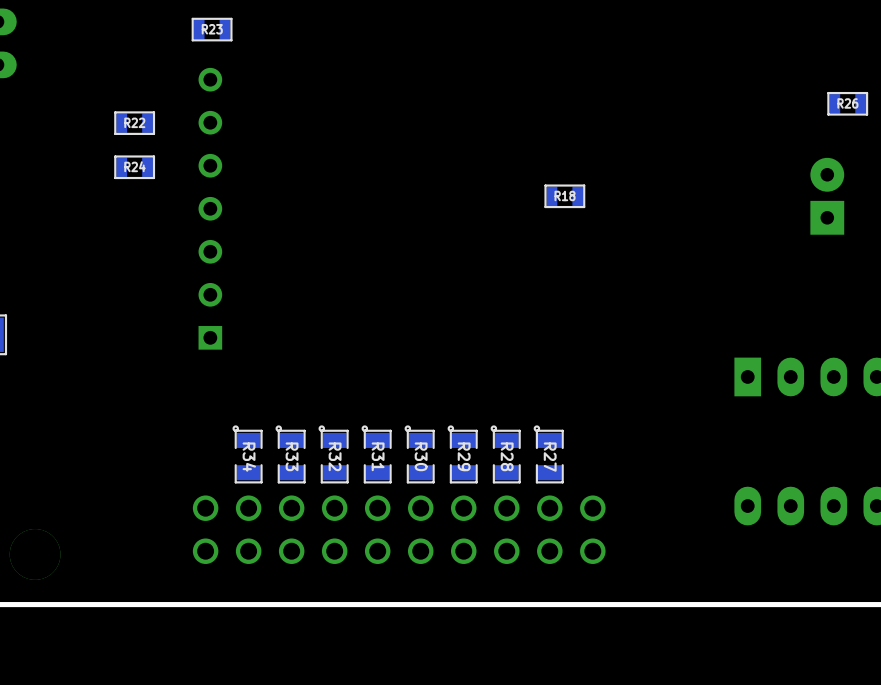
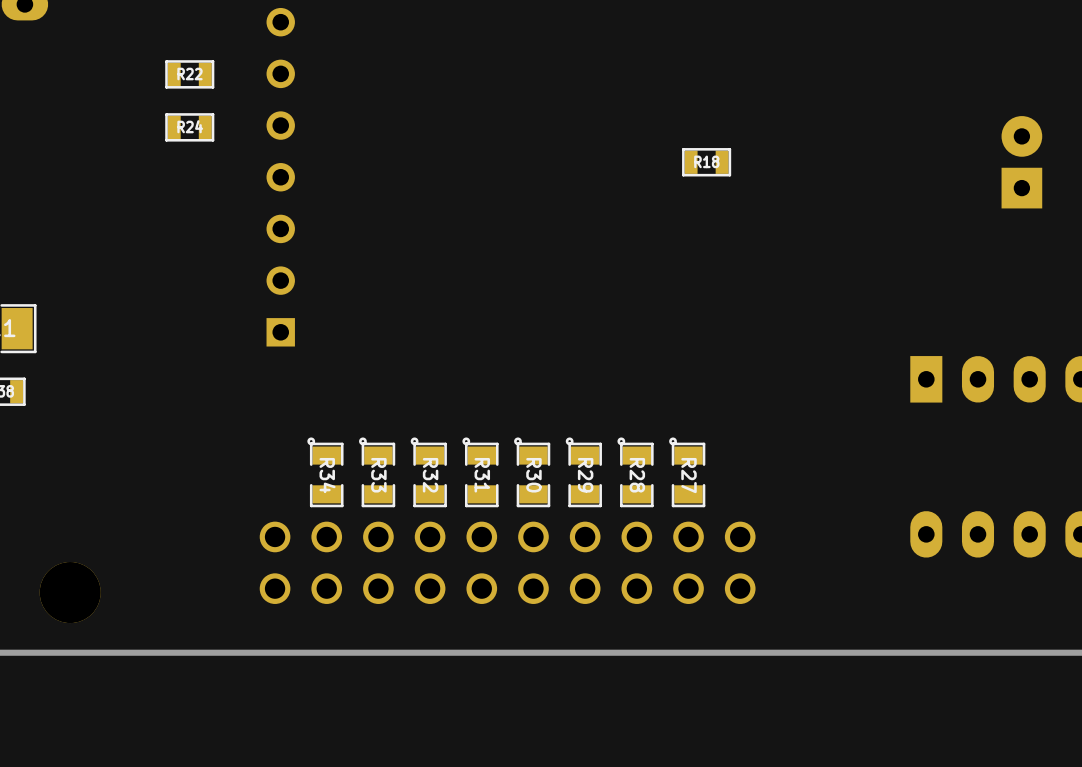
R26: (847, 103) -> none

